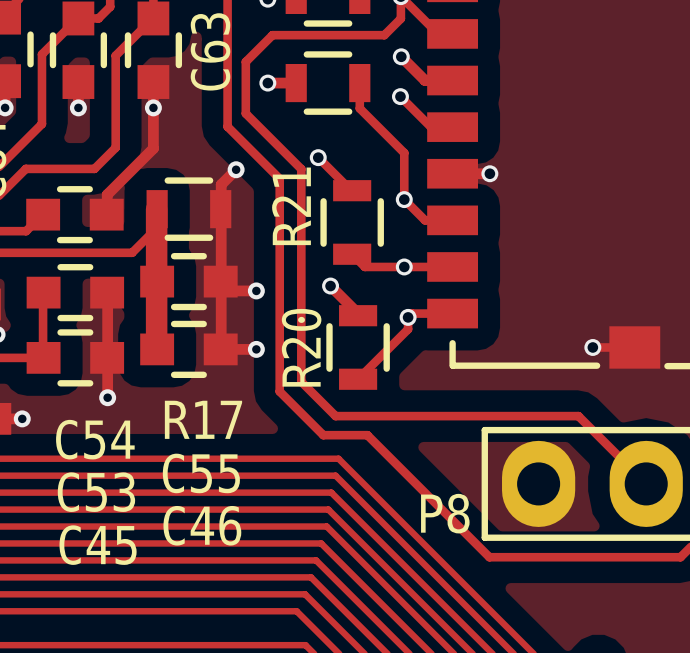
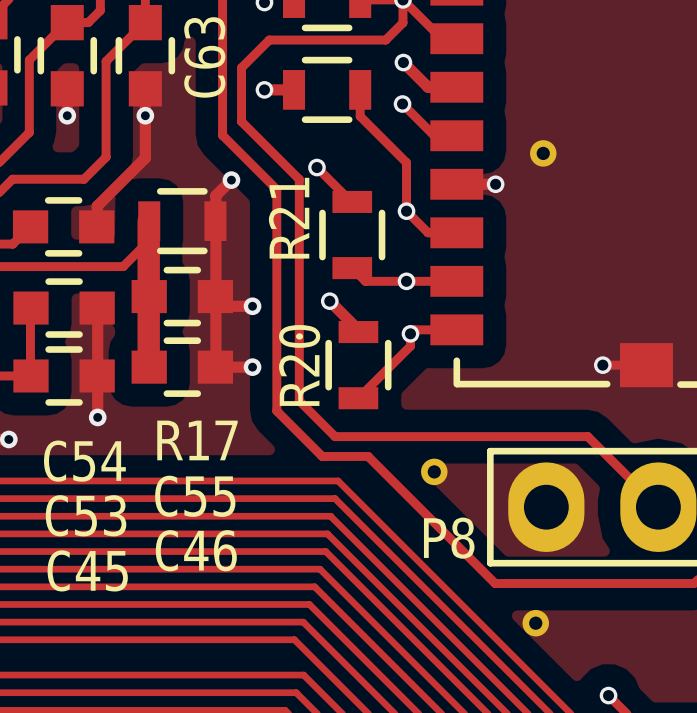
part: none -> (543, 153)
part: none -> (434, 471)
part: none -> (535, 623)

